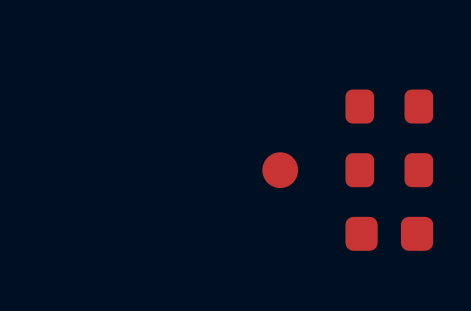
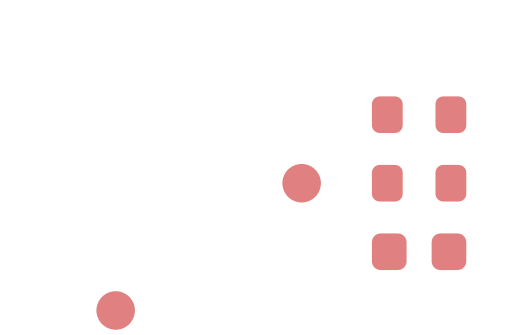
part: none -> (115, 310)

